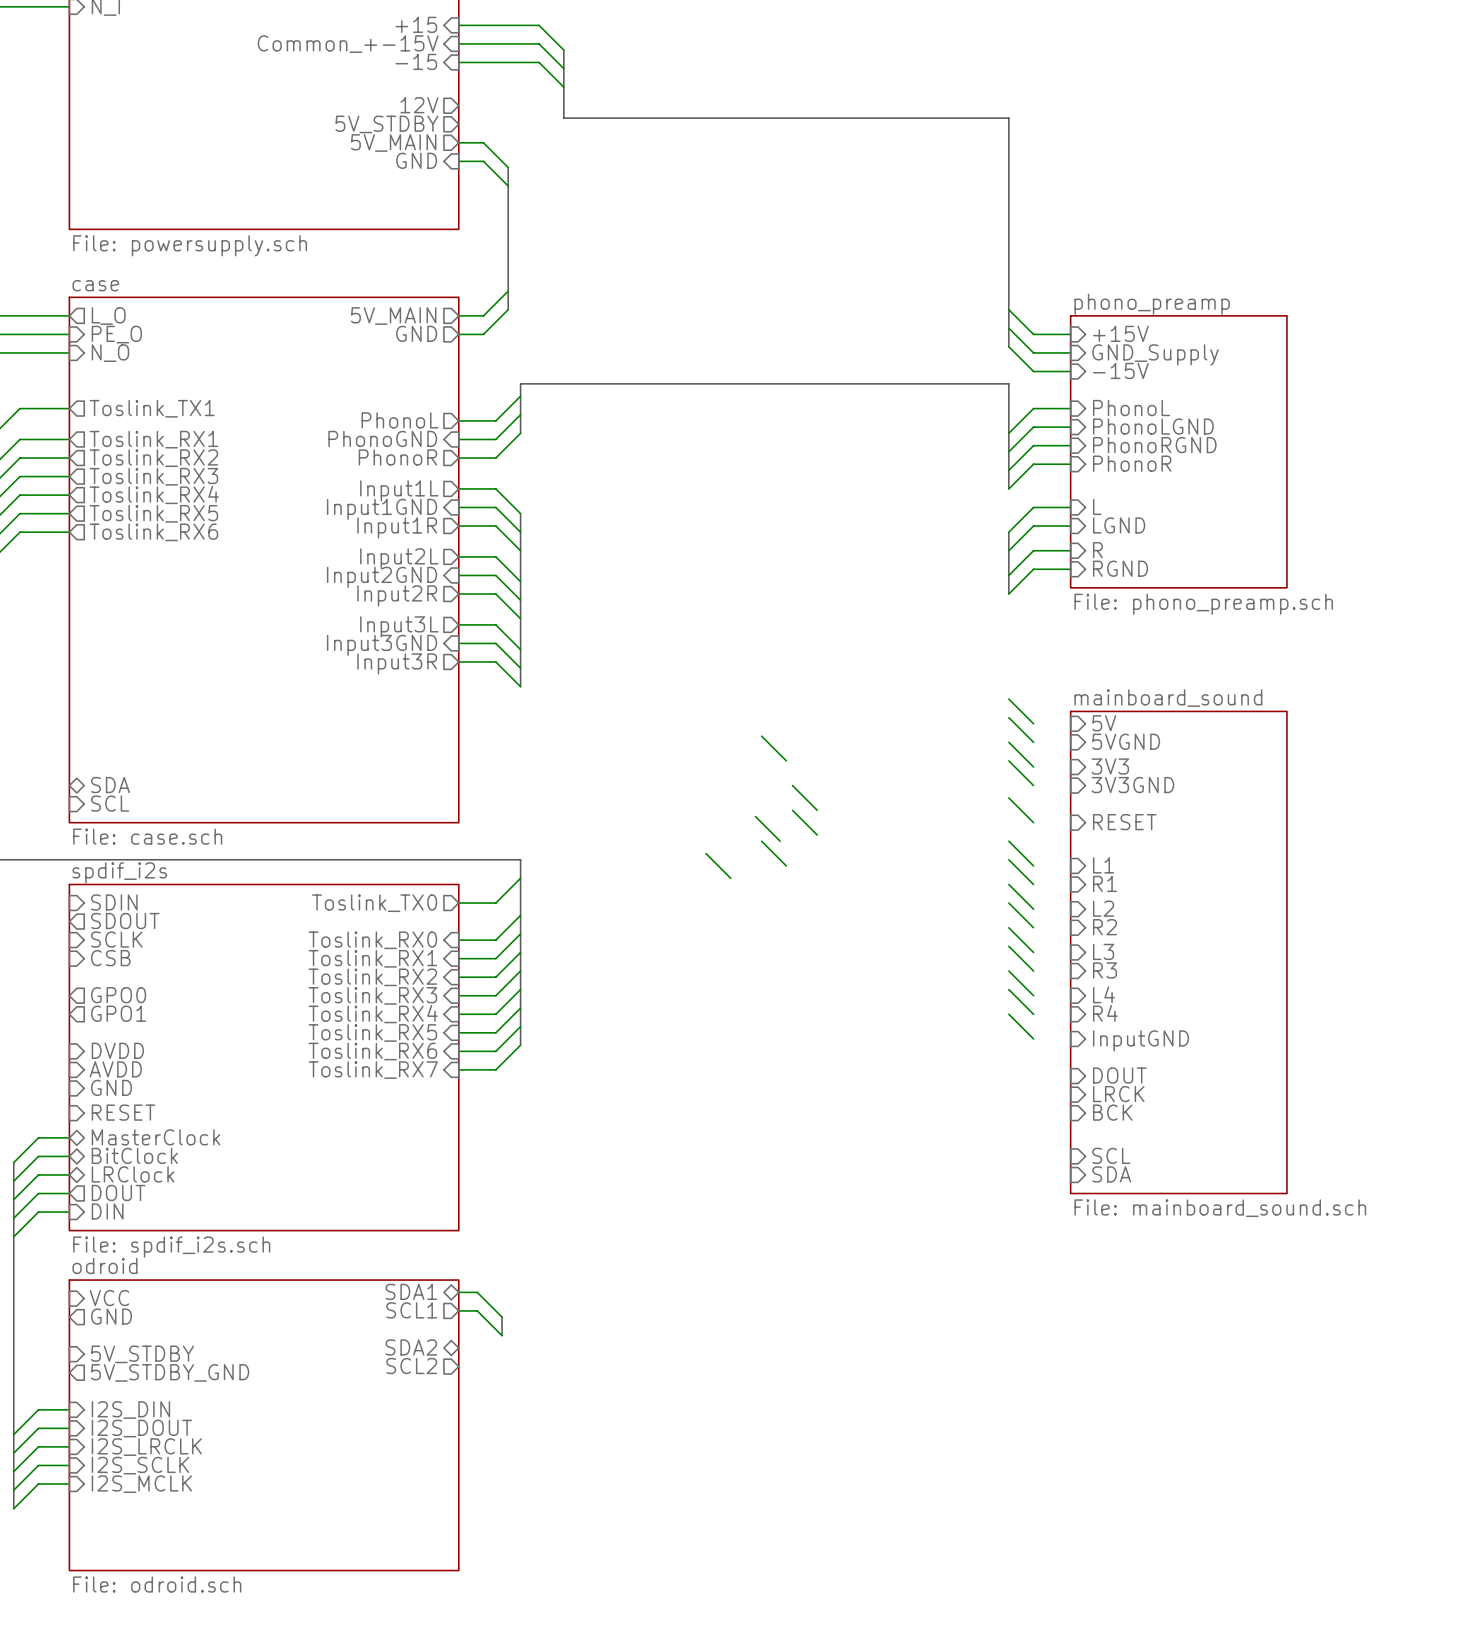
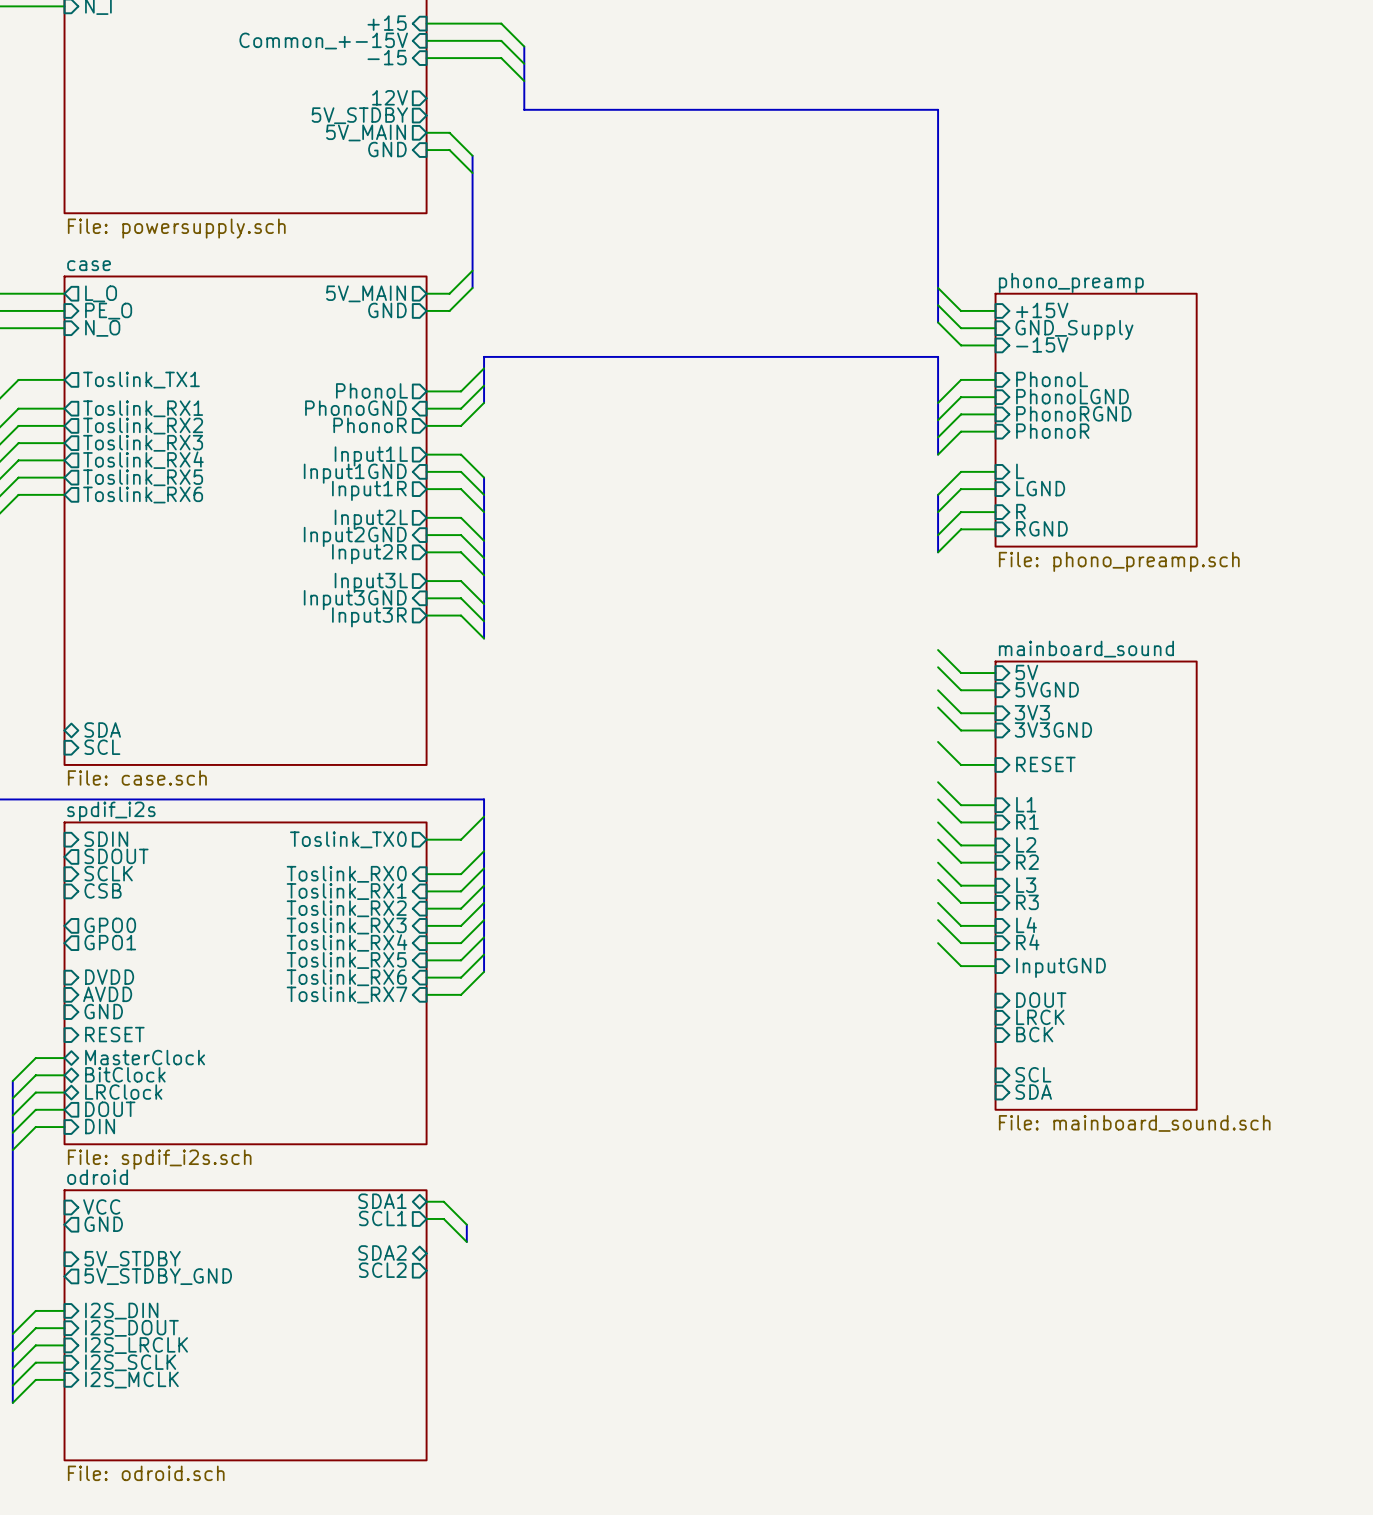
wire: none -> (961, 673) (995, 673)
wire: (761, 736) (786, 760) -> none
wire: none -> (961, 690) (995, 690)
wire: none -> (961, 713) (995, 713)
wire: (792, 785) (817, 810) -> none
wire: none -> (961, 730) (995, 730)
wire: (792, 810) (817, 835) -> none
wire: (755, 816) (780, 841) -> none
wire: none -> (961, 764) (995, 764)
wire: (761, 841) (786, 865) -> none
wire: (705, 853) (730, 878) -> none
wire: none -> (961, 805) (995, 805)
wire: none -> (961, 822) (995, 822)
wire: none -> (961, 845) (995, 845)
wire: none -> (961, 862) (995, 862)
wire: none -> (961, 885) (995, 885)
wire: none -> (961, 902) (995, 902)
wire: none -> (961, 925) (995, 925)
wire: none -> (961, 943) (995, 943)
wire: none -> (961, 966) (995, 966)

